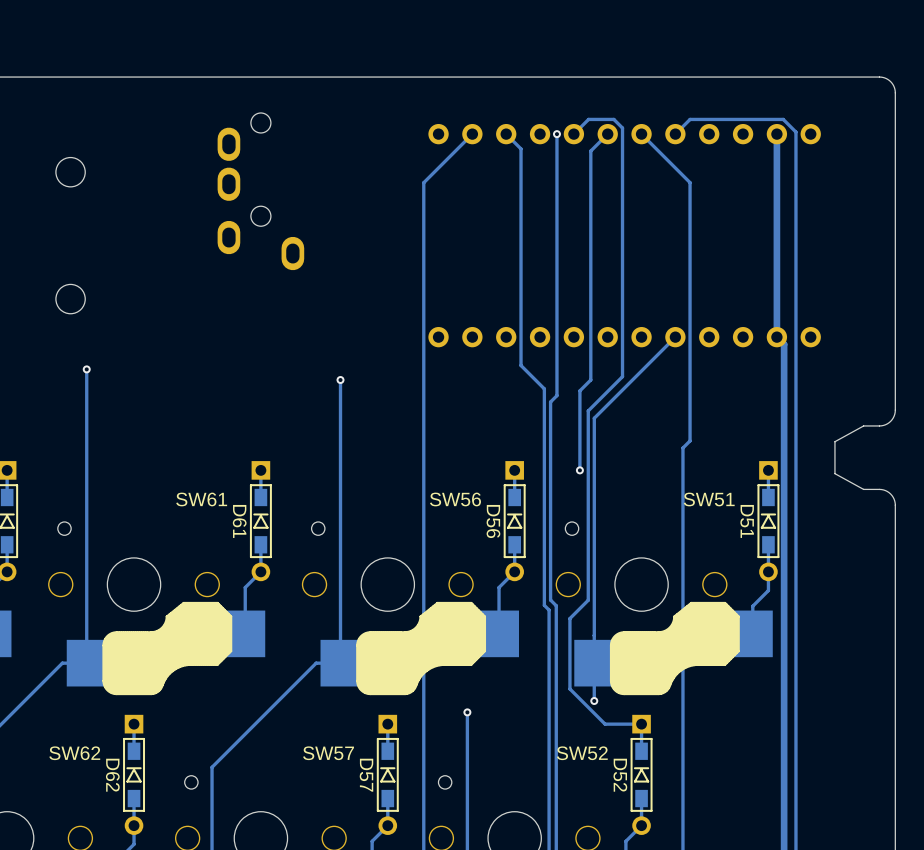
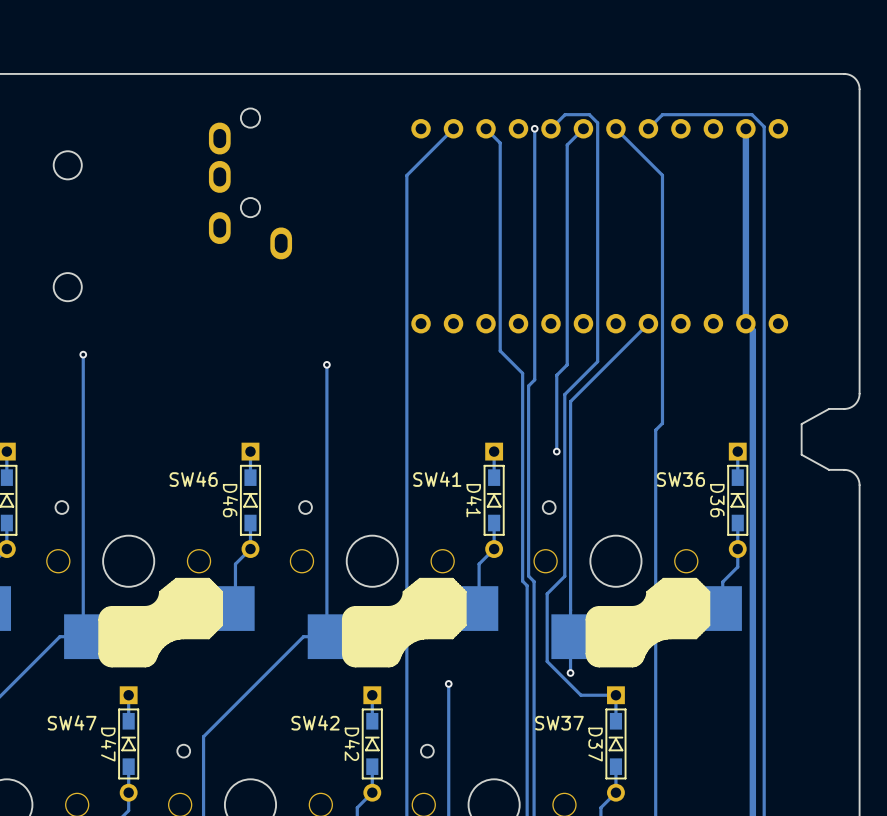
SW61 name: SW61 (201, 499) -> SW46 (193, 479)
SW56 name: SW56 (455, 499) -> SW41 (437, 479)
SW51 name: SW51 (709, 499) -> SW36 (680, 479)
D61 name: D61 (239, 521) -> D46 (230, 500)
D56 name: D56 (493, 521) -> D41 (474, 500)
D51 name: D51 (747, 521) -> D36 (717, 500)
SW62 name: SW62 (74, 753) -> SW47 (72, 722)
SW57 name: SW57 (328, 753) -> SW42 (315, 722)
SW52 name: SW52 (582, 753) -> SW37 (559, 723)
D62 name: D62 (112, 775) -> D47 (108, 744)
D57 name: D57 (366, 775) -> D42 (352, 744)
D52 name: D52 (620, 775) -> D37 (595, 744)

